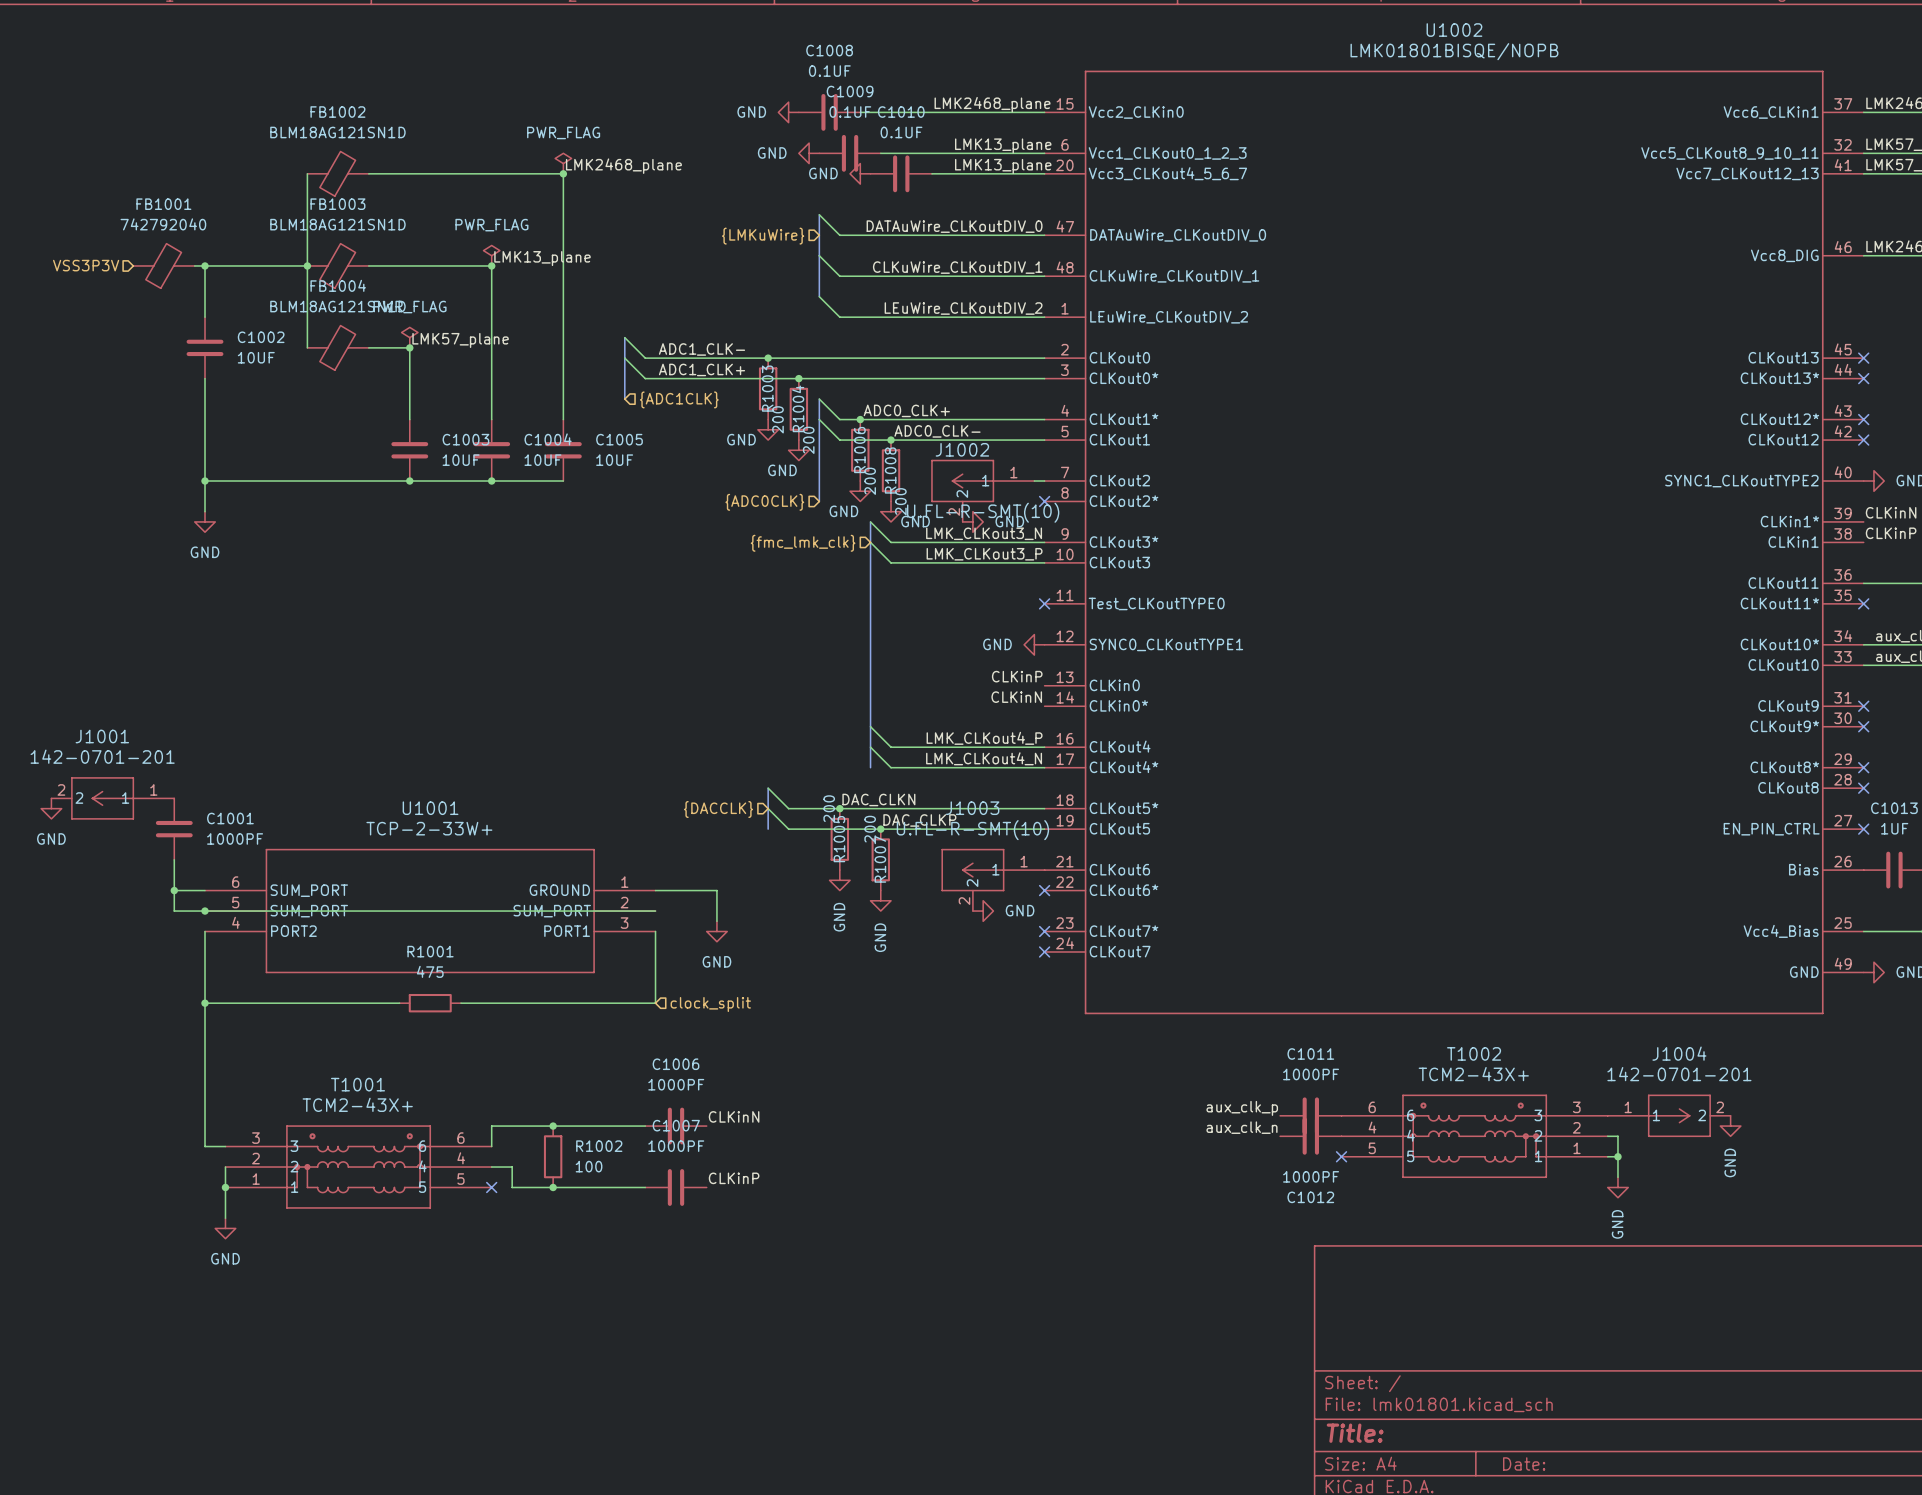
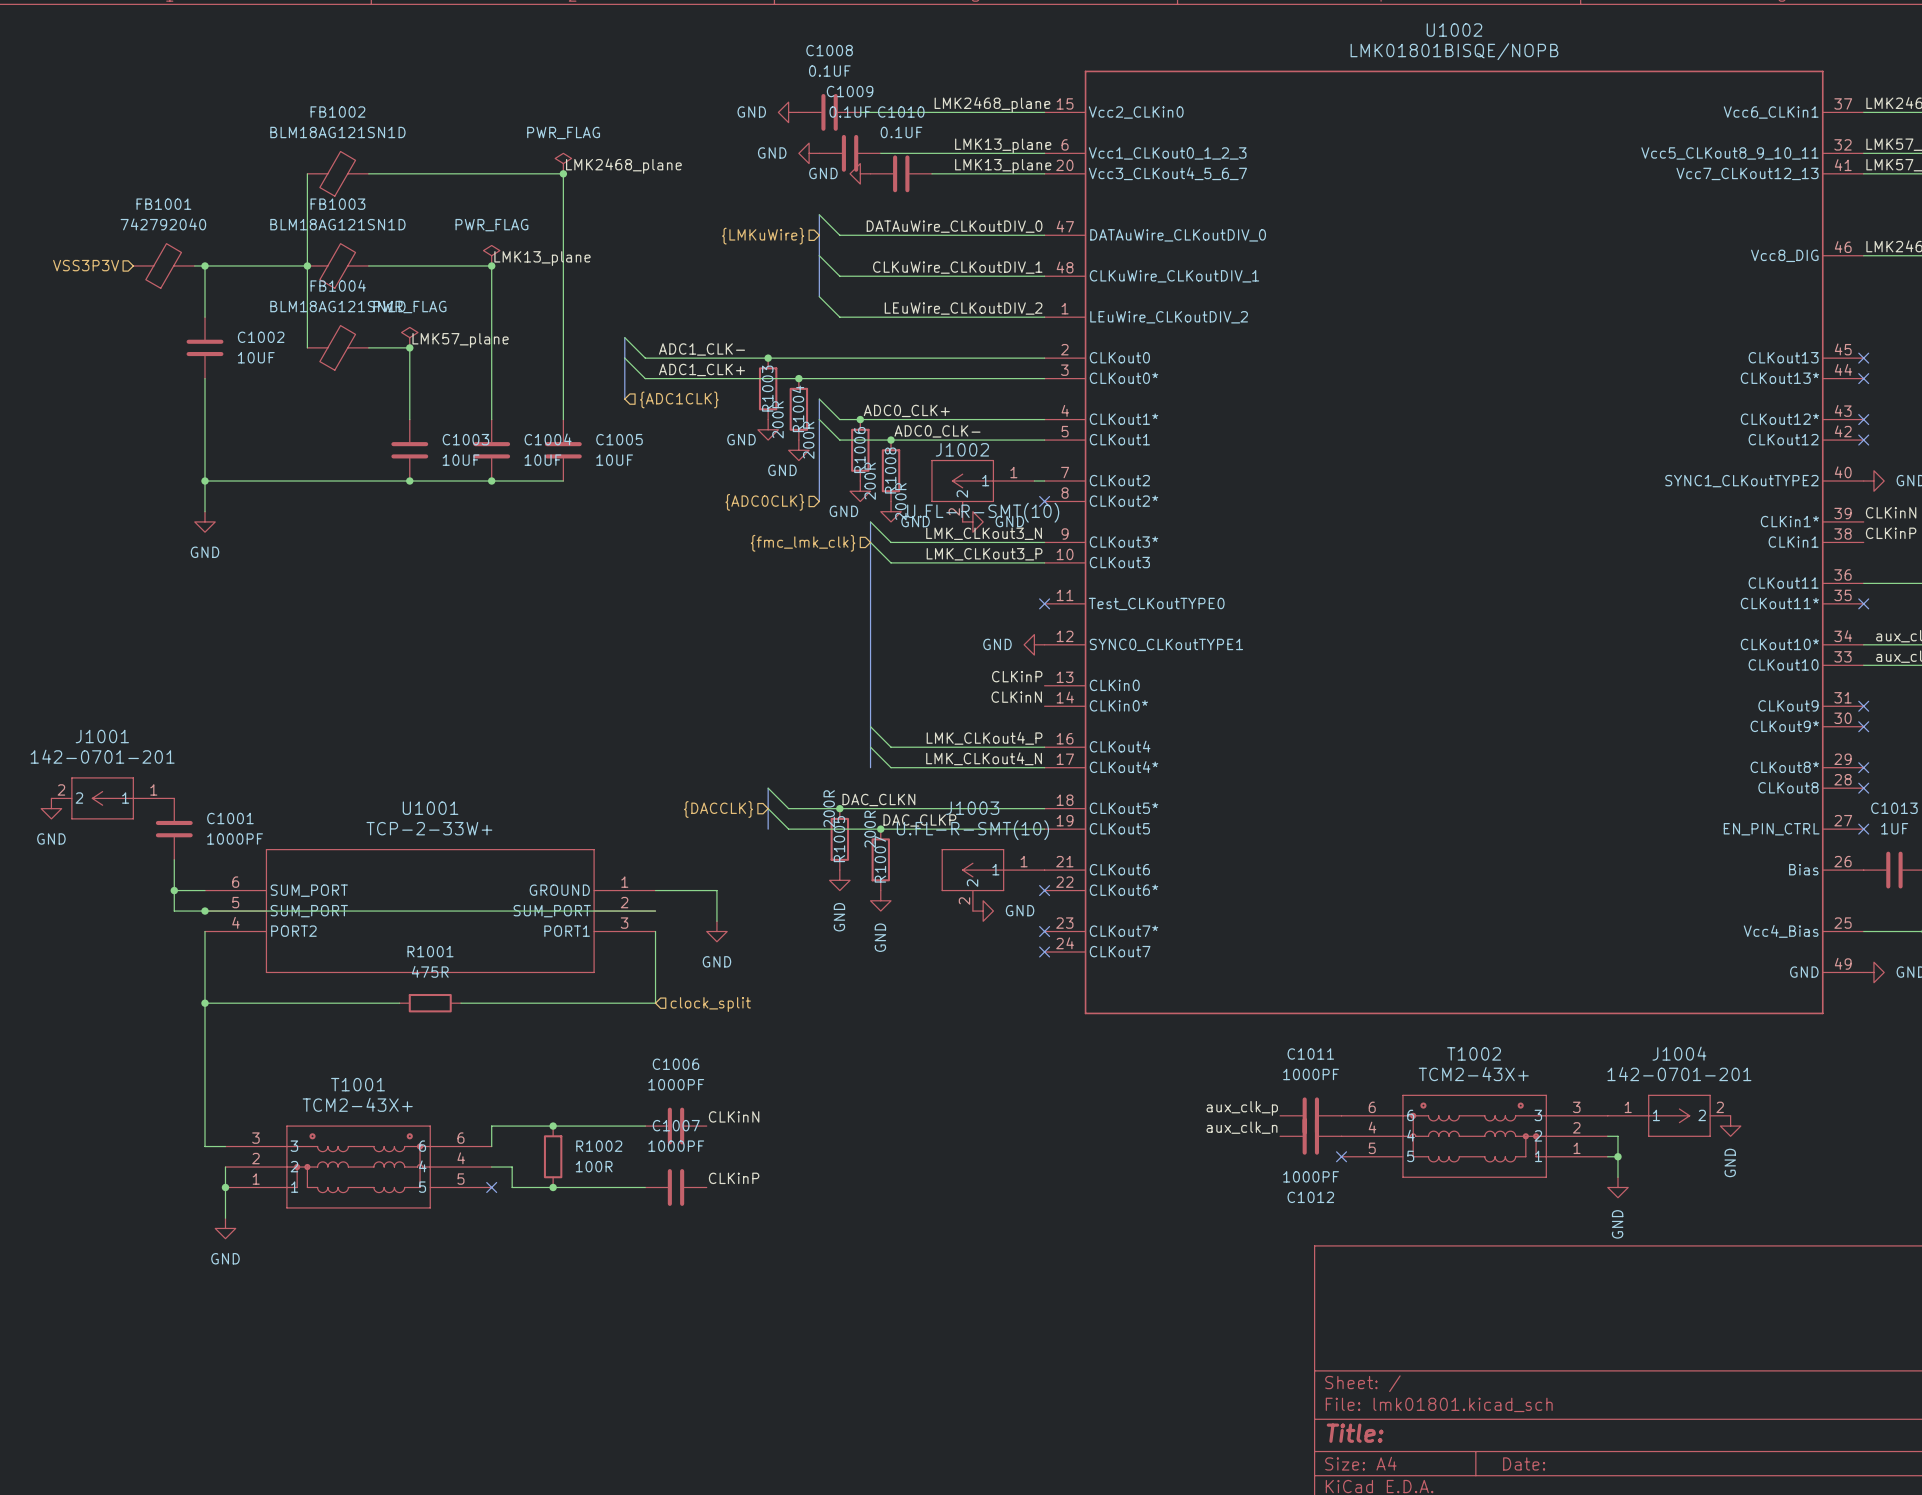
R1003 value: 200 (778, 419) -> 200R (778, 419)
R1004 value: 200 (808, 440) -> 200R (808, 440)
R1006 value: 200 (870, 481) -> 200R (870, 481)
R1008 value: 200 (900, 501) -> 200R (900, 501)
R1005 value: 200 (829, 808) -> 200R (829, 808)
R1007 value: 200 (870, 829) -> 200R (870, 829)
R1001 value: 475 (430, 971) -> 475R (430, 971)
R1002 value: 100 (589, 1166) -> 100R (594, 1166)

